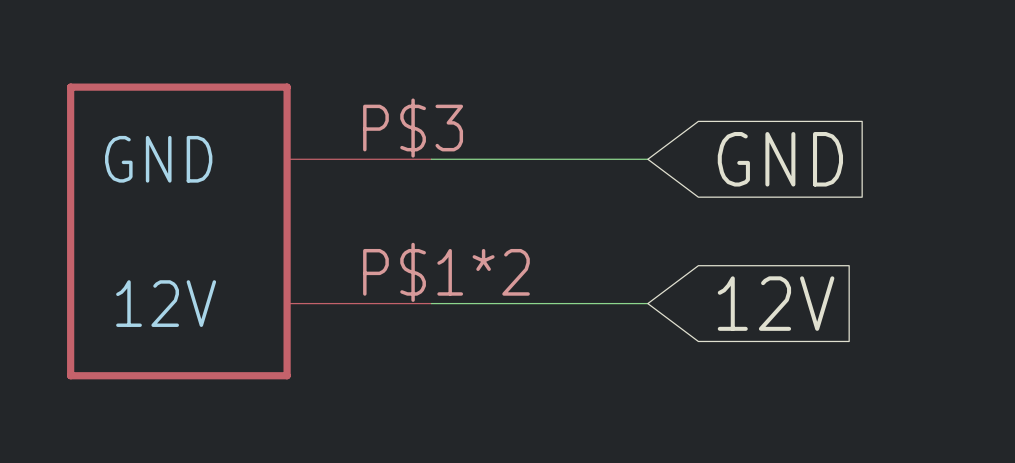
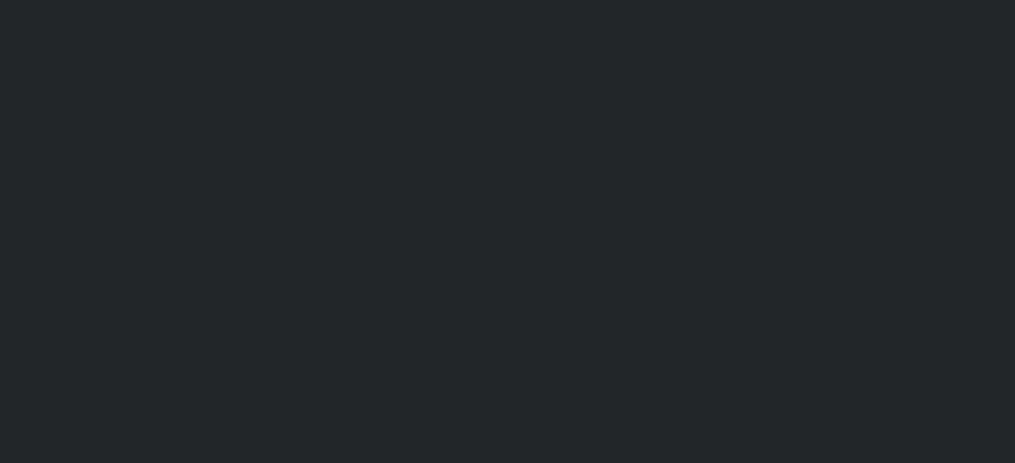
wire: (431, 159) (647, 159) -> none
global label: GND (780, 159) -> none
part: (249, 231) -> none
wire: (431, 303) (647, 303) -> none
global label: 12V (776, 303) -> none

